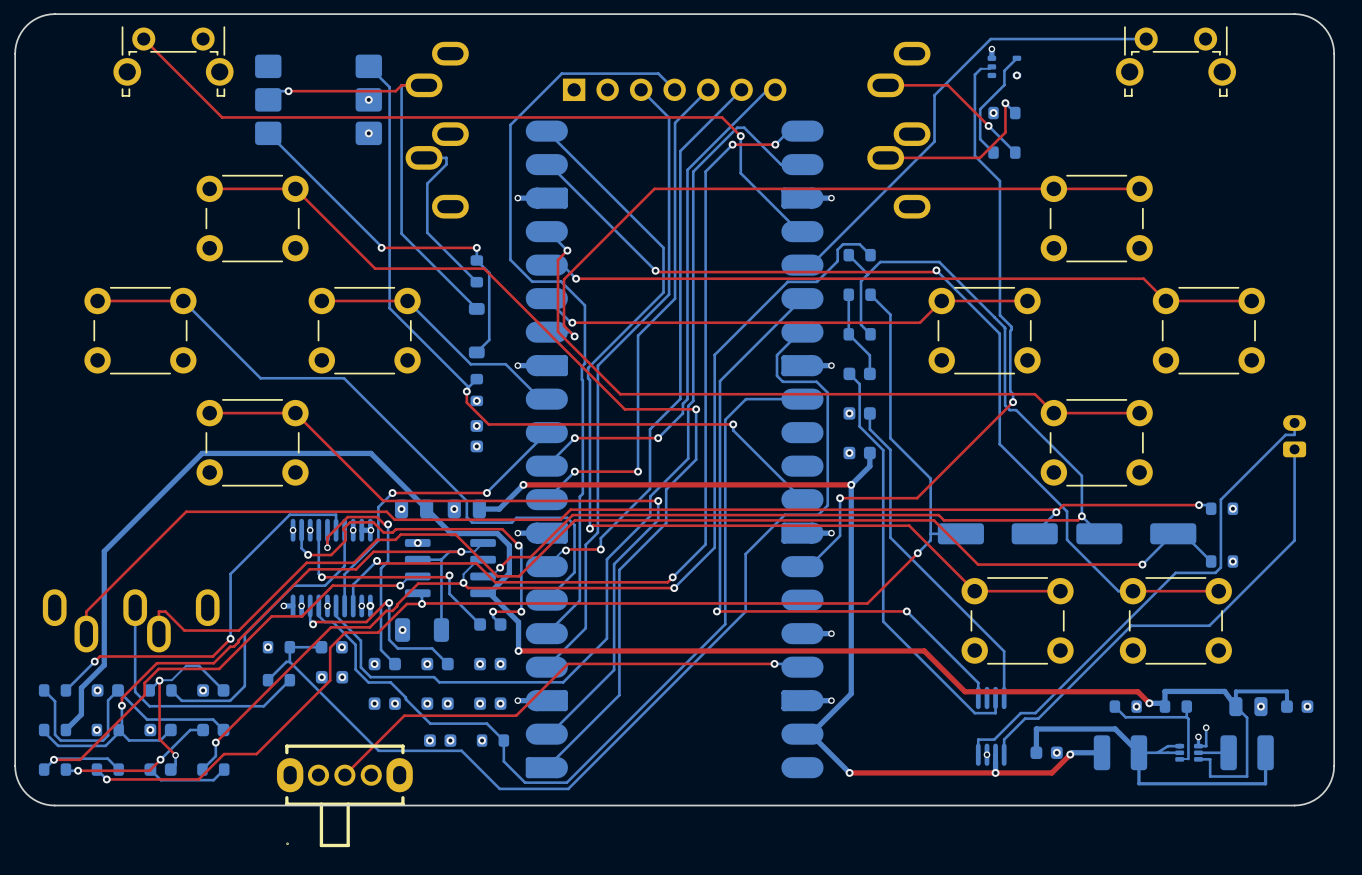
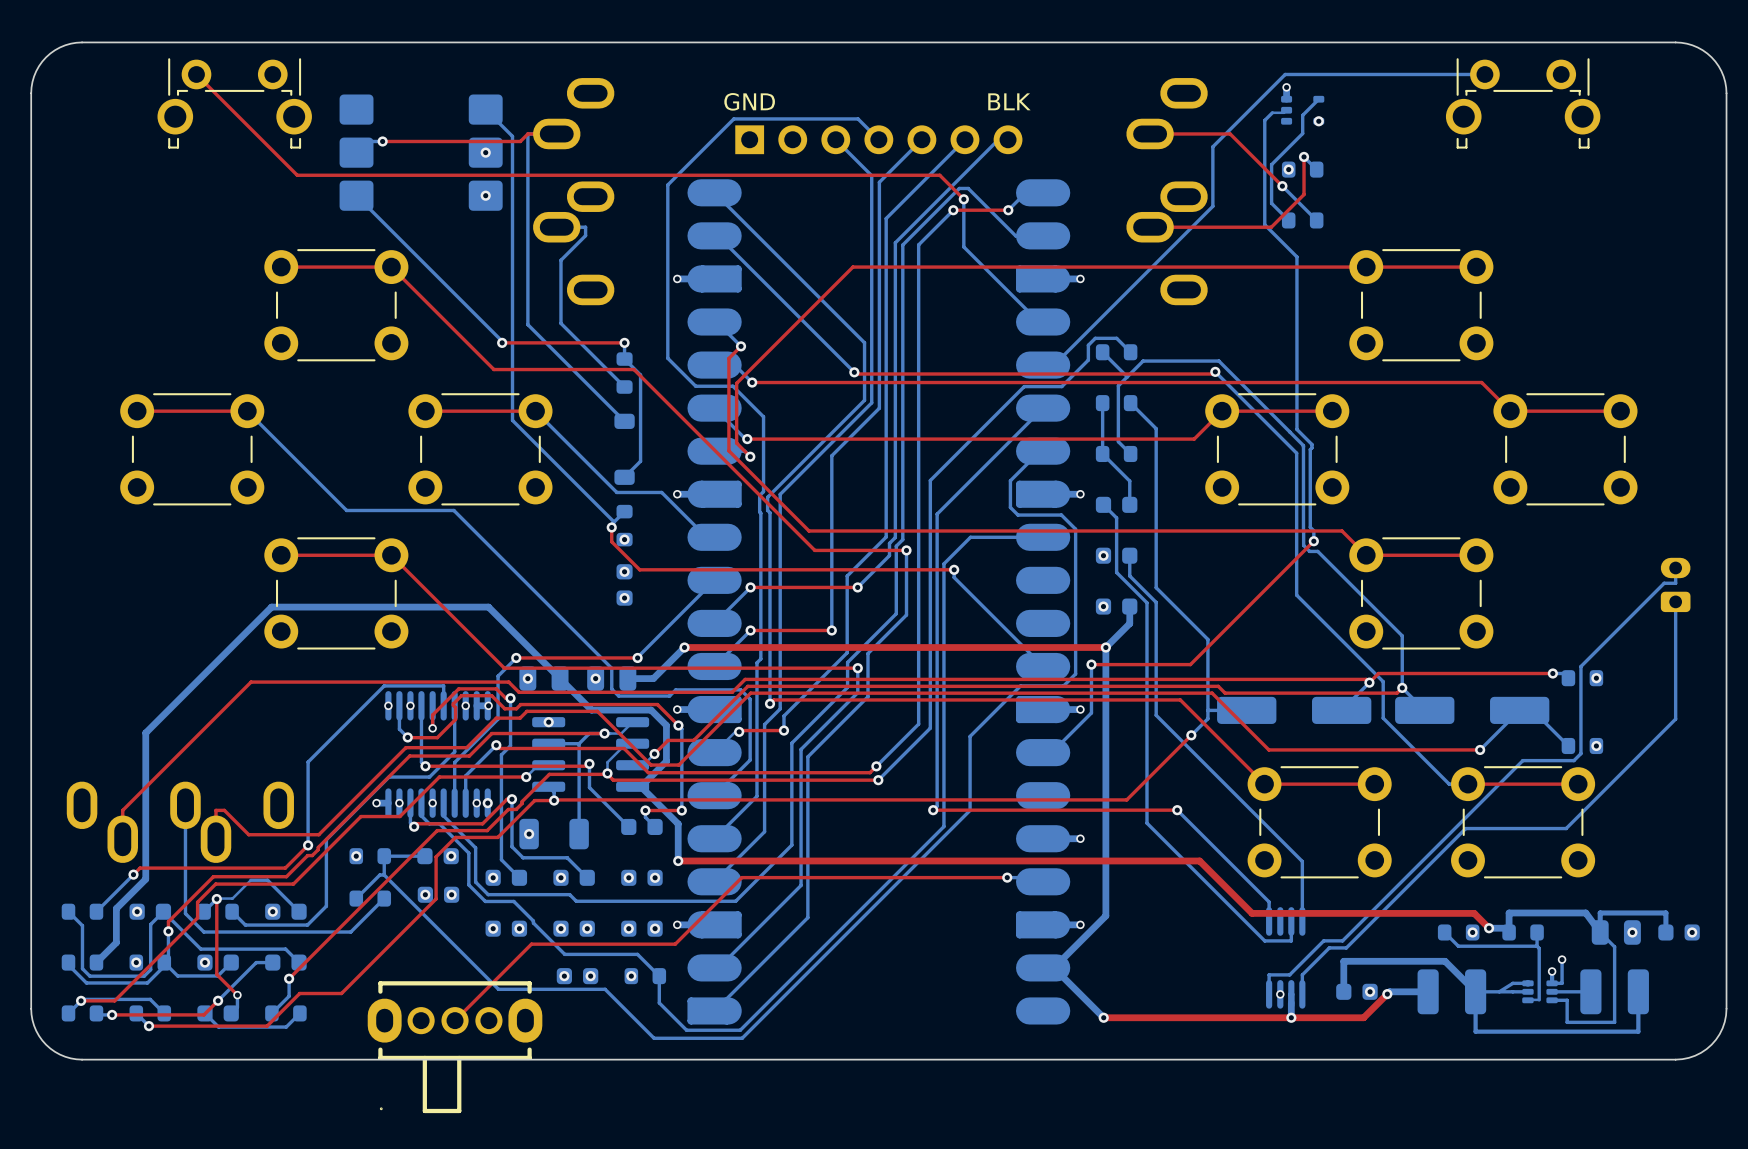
part text: none -> GND (749, 101)
part text: none -> BLK (1009, 101)

